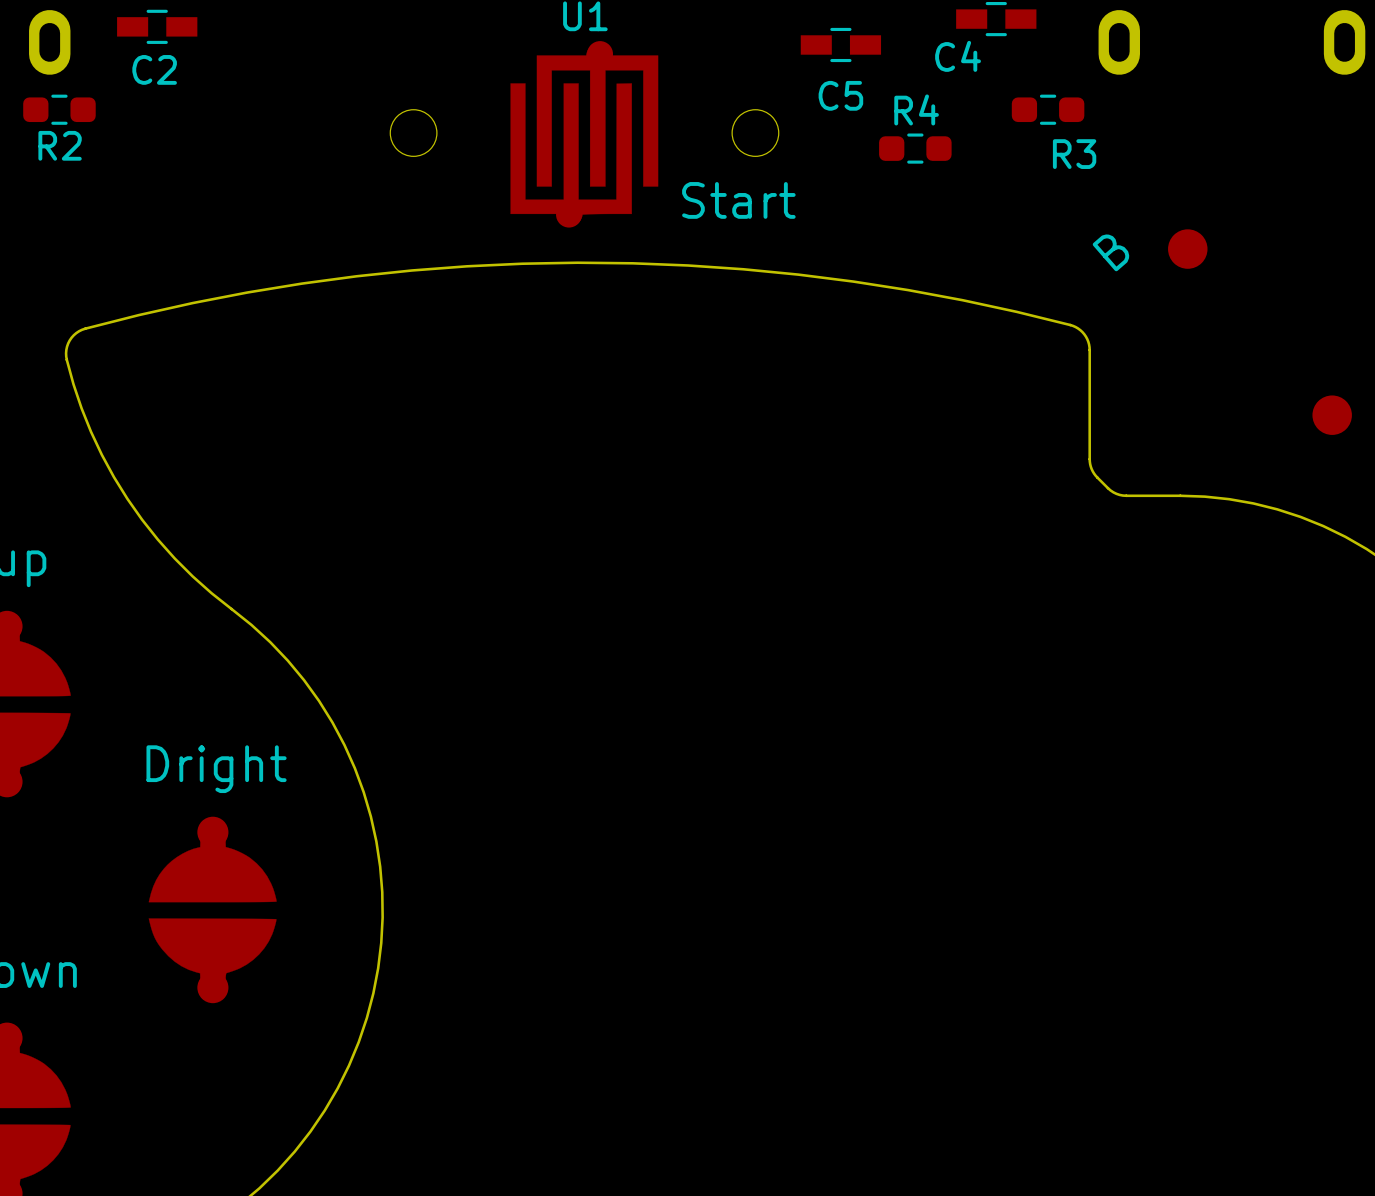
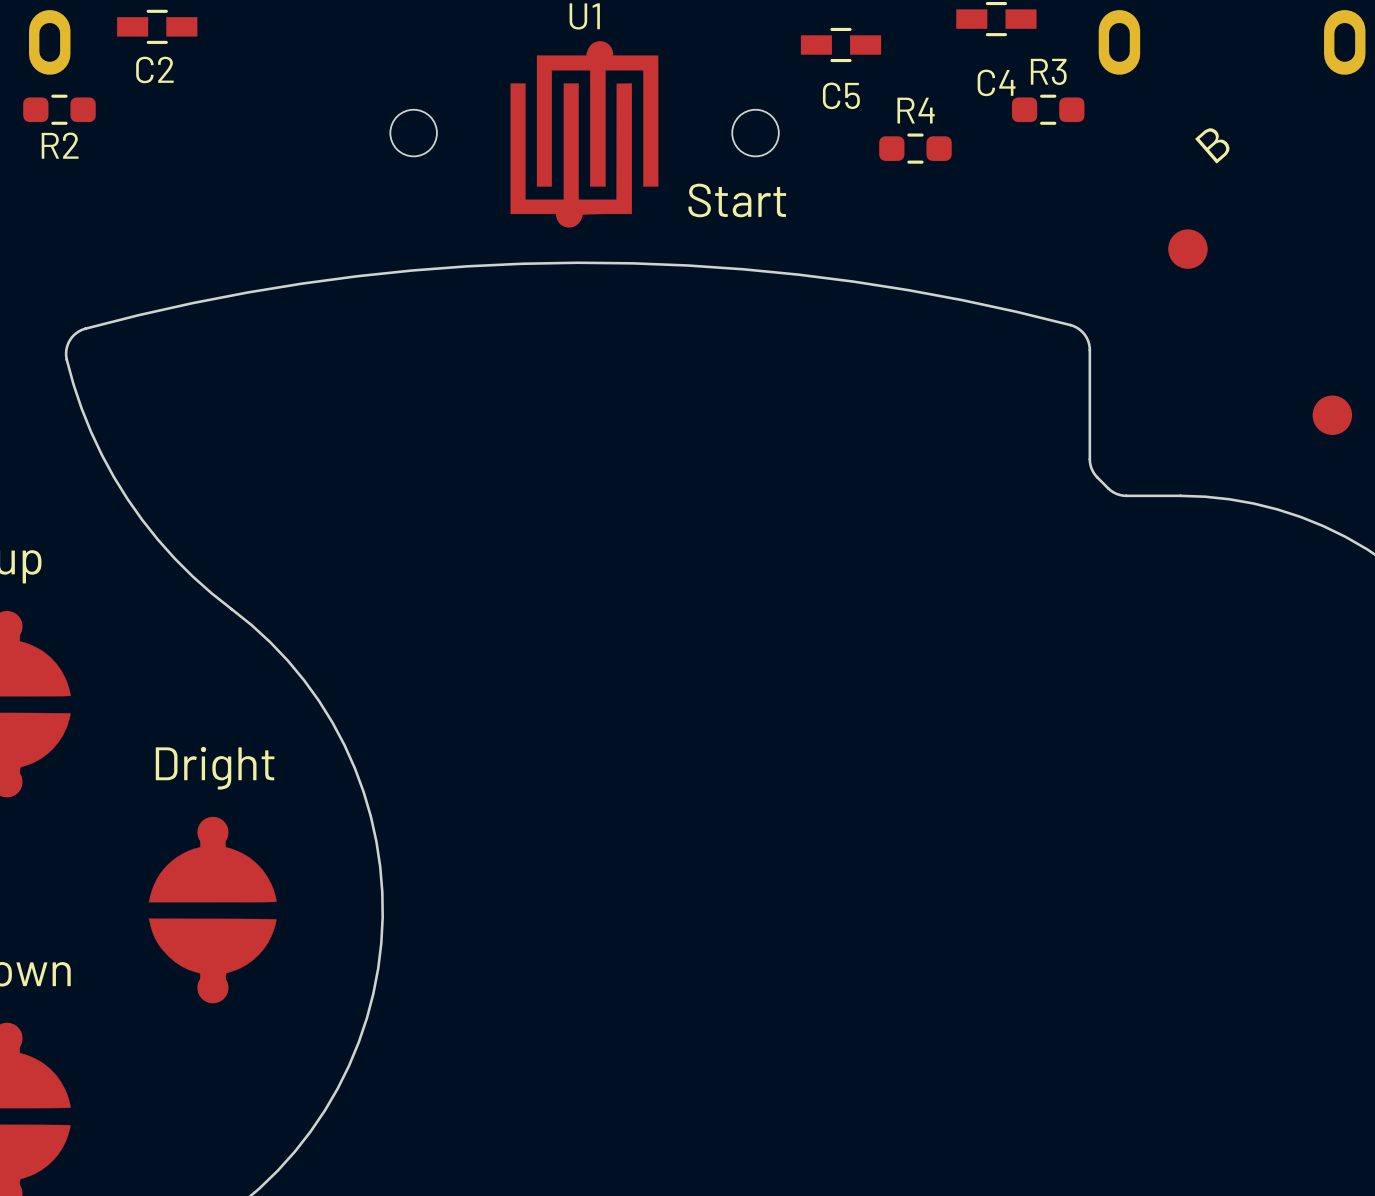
C4 name position: C4 (958, 56) -> C4 (996, 82)
R3 name position: R3 (1074, 154) -> R3 (1048, 71)
part value position: B (1110, 252) -> B (1212, 145)

